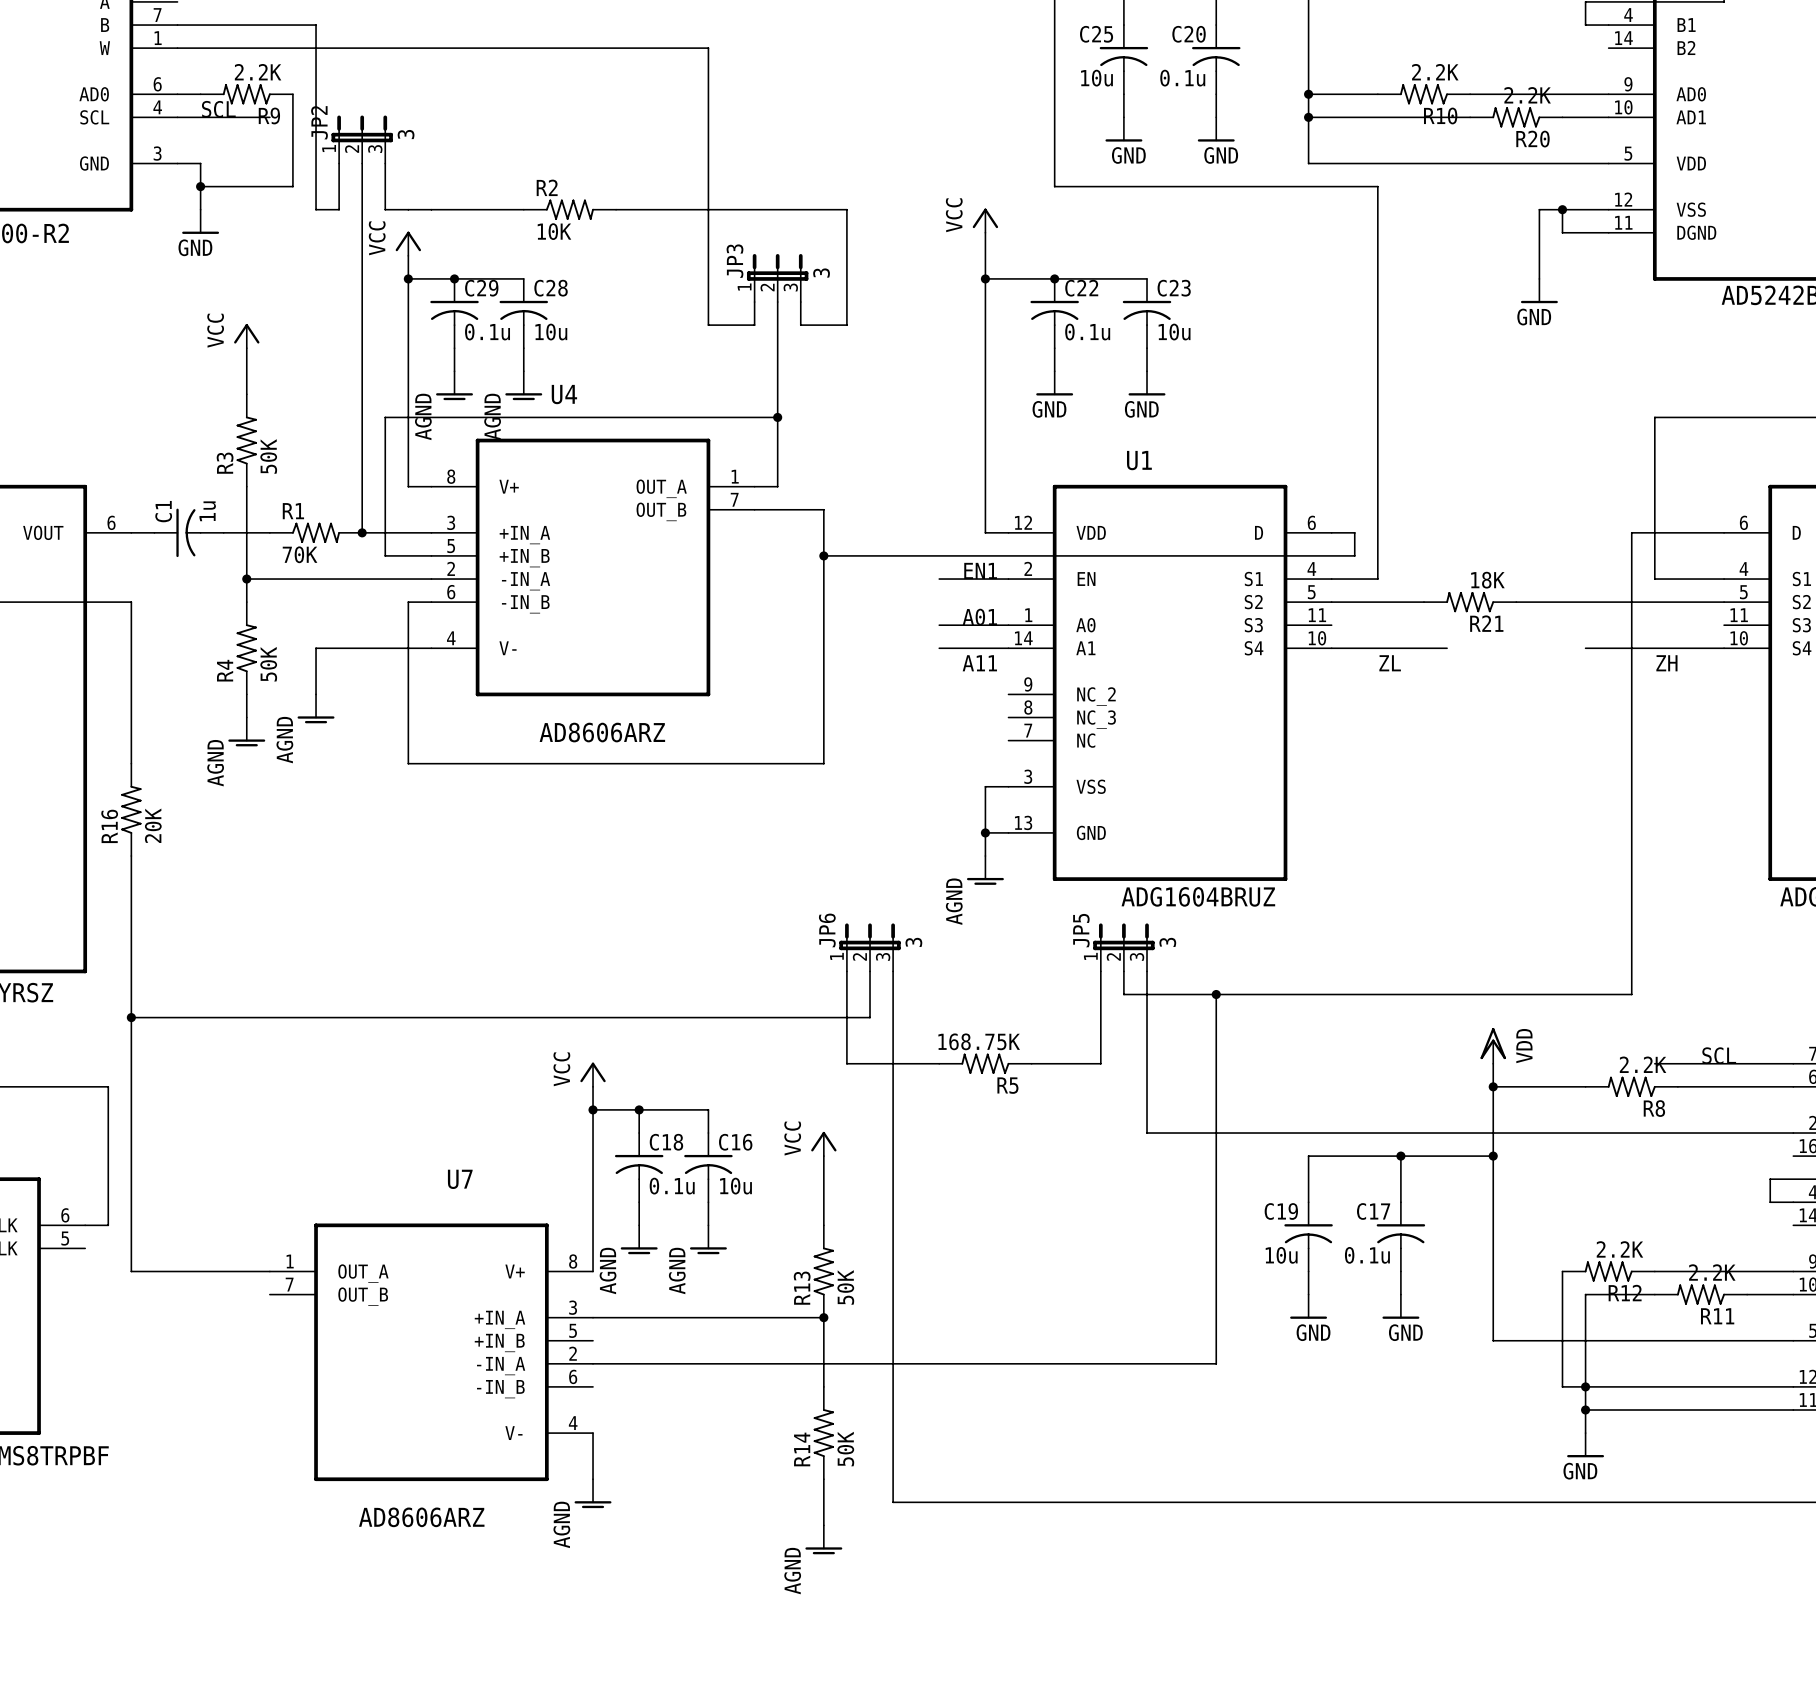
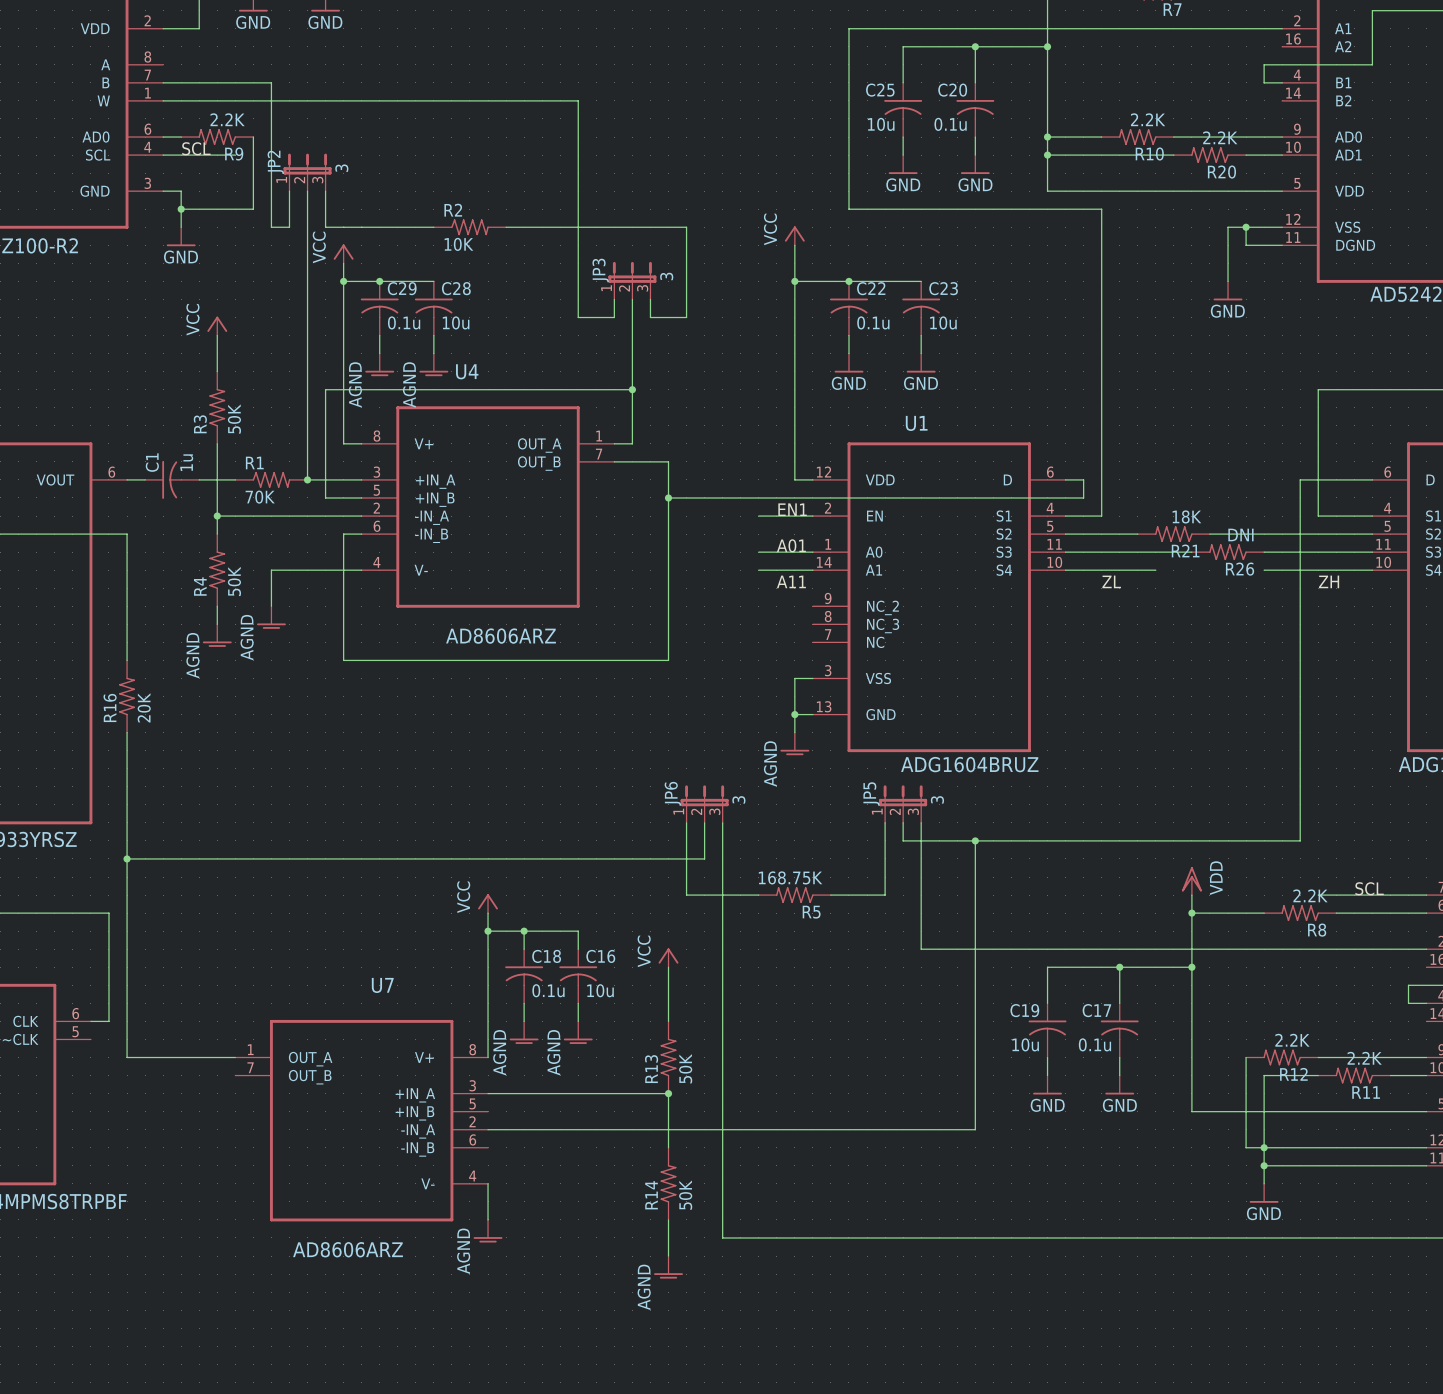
wire: none -> (1065, 552) (1191, 552)
R26: none -> DNI (1228, 552)
wire: none -> (1264, 552) (1372, 552)

